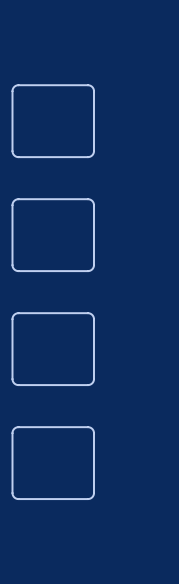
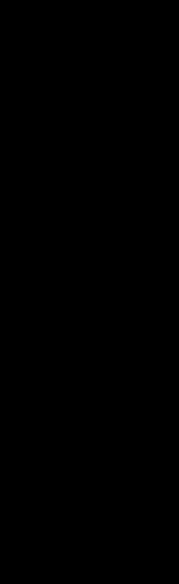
part: (53, 121) -> none
part: (53, 235) -> none
part: (53, 349) -> none
part: (53, 463) -> none

